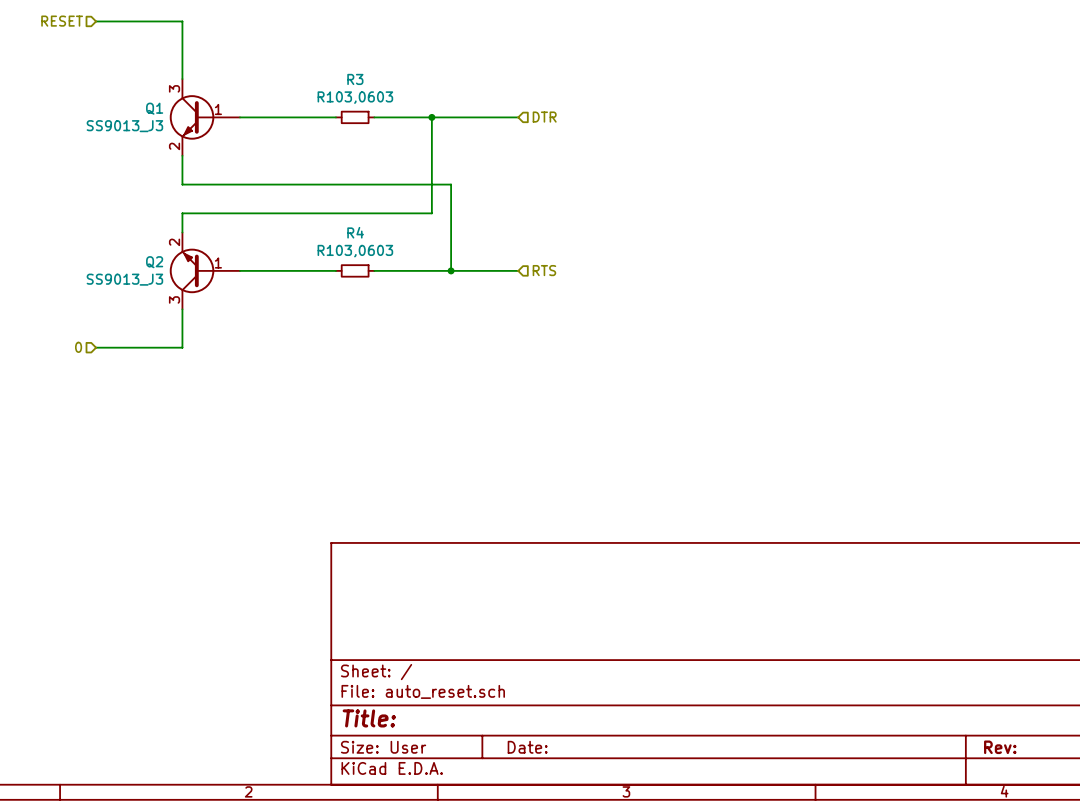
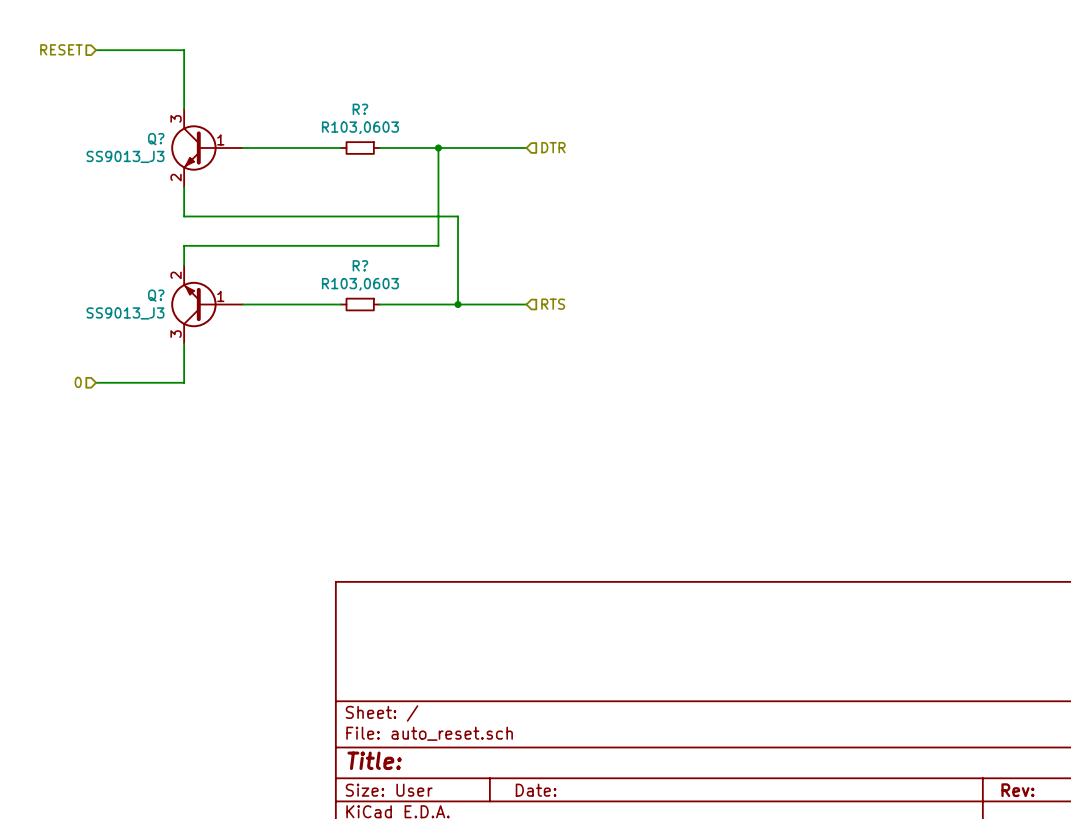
R3 name: R3 (355, 79) -> R? (360, 109)
Q1 name: Q1 (154, 108) -> Q? (156, 139)
R4 name: R4 (355, 232) -> R? (360, 265)
Q2 name: Q2 (154, 262) -> Q? (156, 295)

